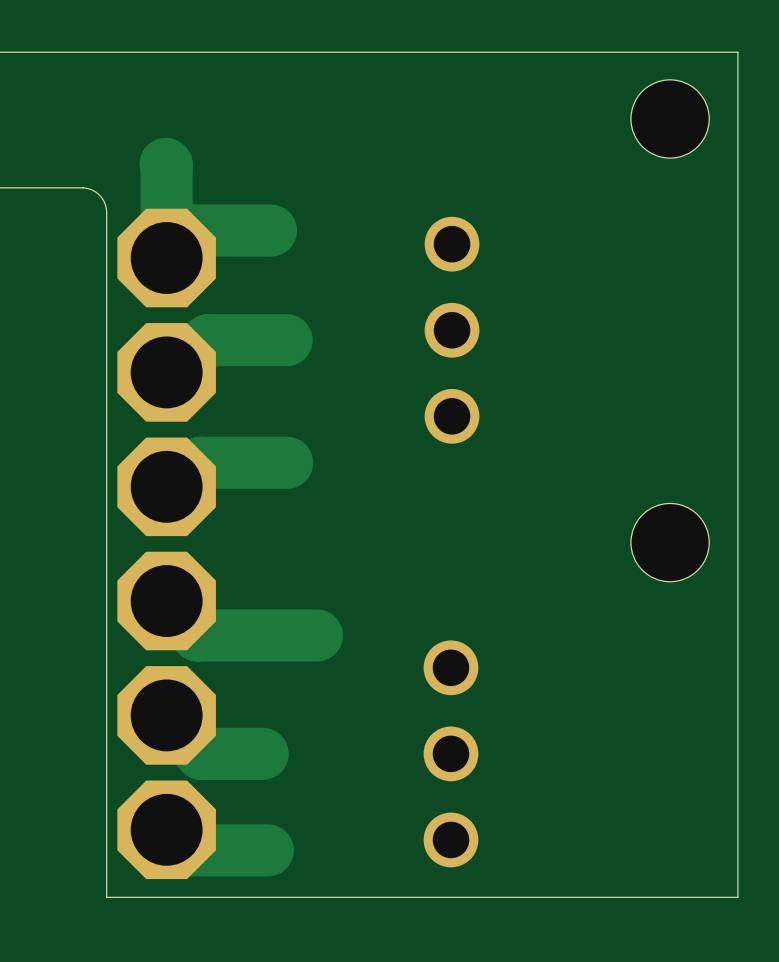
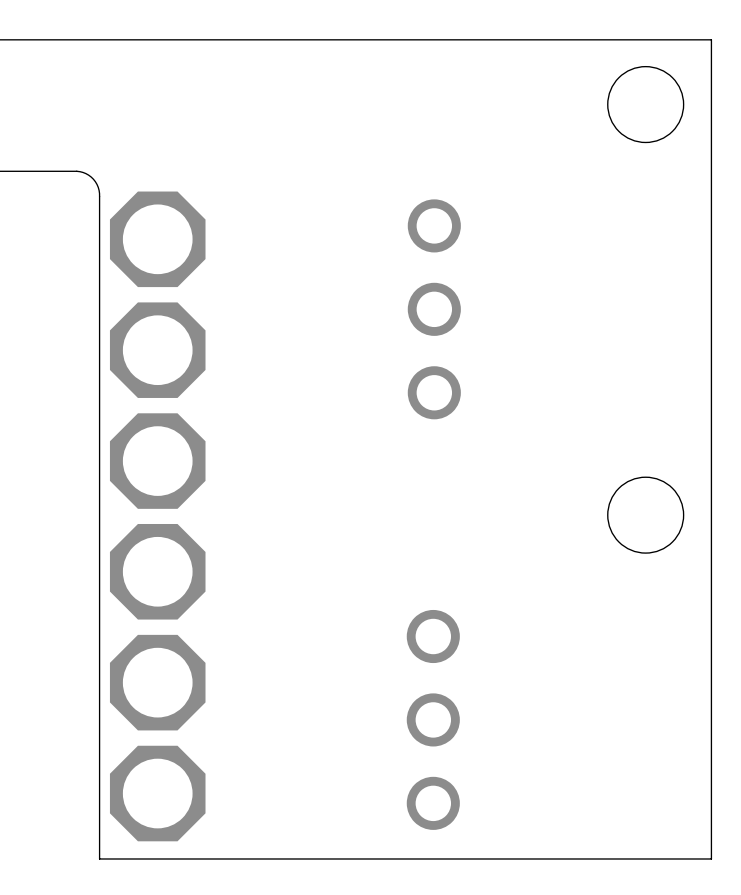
track: (165, 163) (166, 258) (194, 230) (270, 230) -> none
track: (286, 340) (208, 340) (166, 372) -> none
track: (287, 462) (200, 462) (166, 486) -> none
track: (166, 601) (197, 635) (316, 635) -> none
track: (166, 715) (201, 753) (262, 753) -> none
track: (166, 829) (183, 850) (267, 850) -> none

